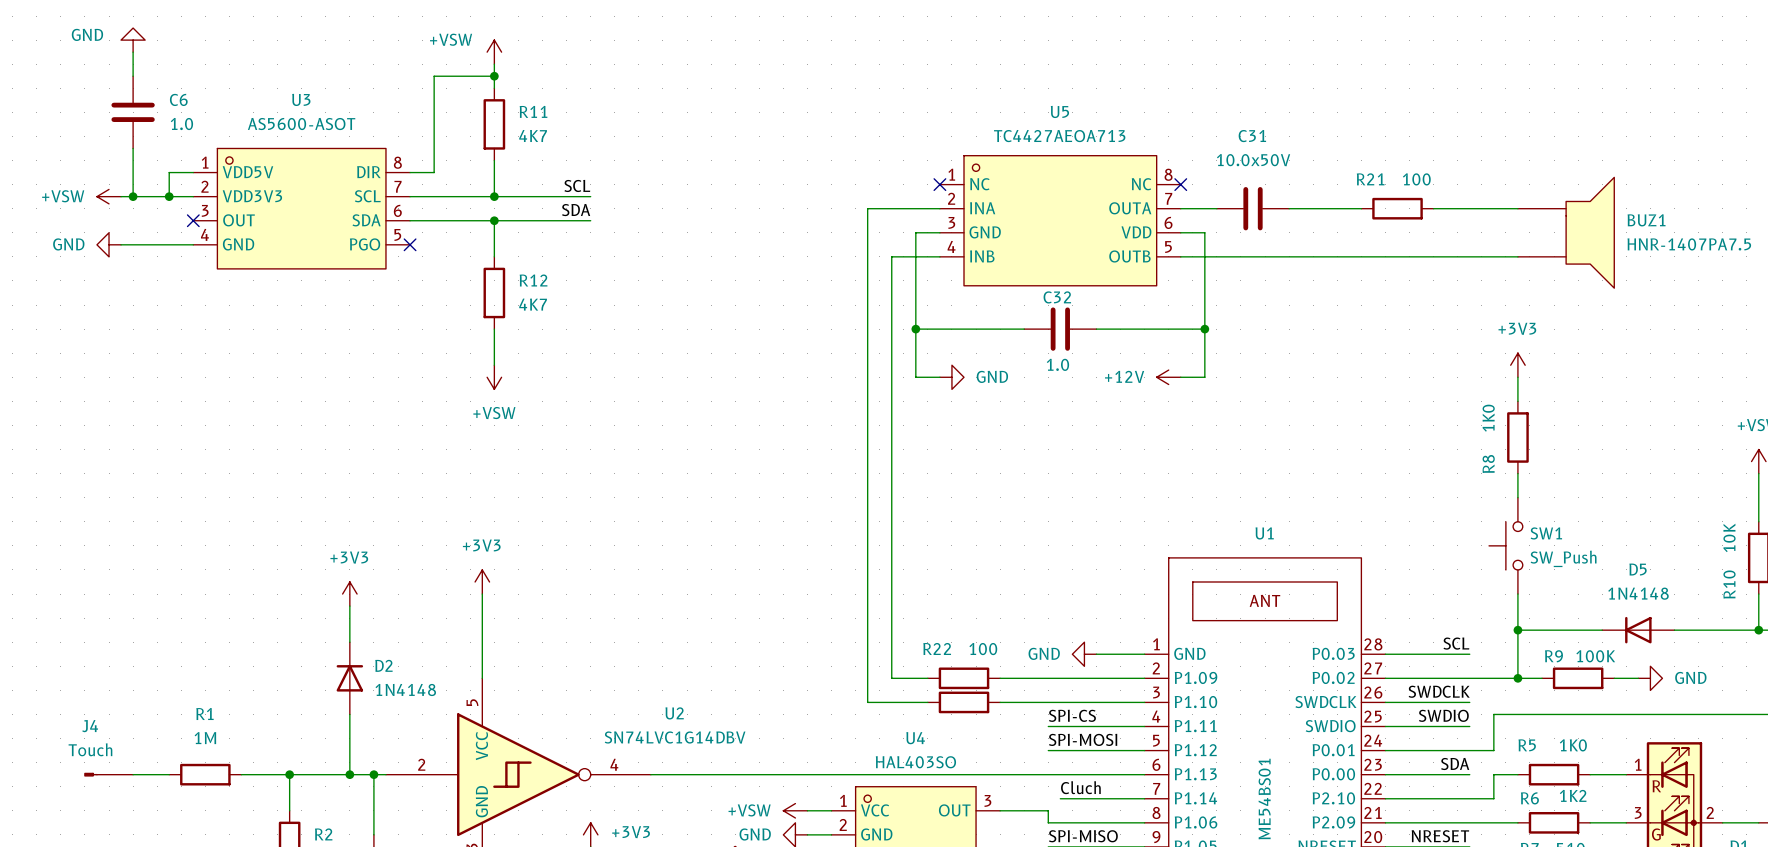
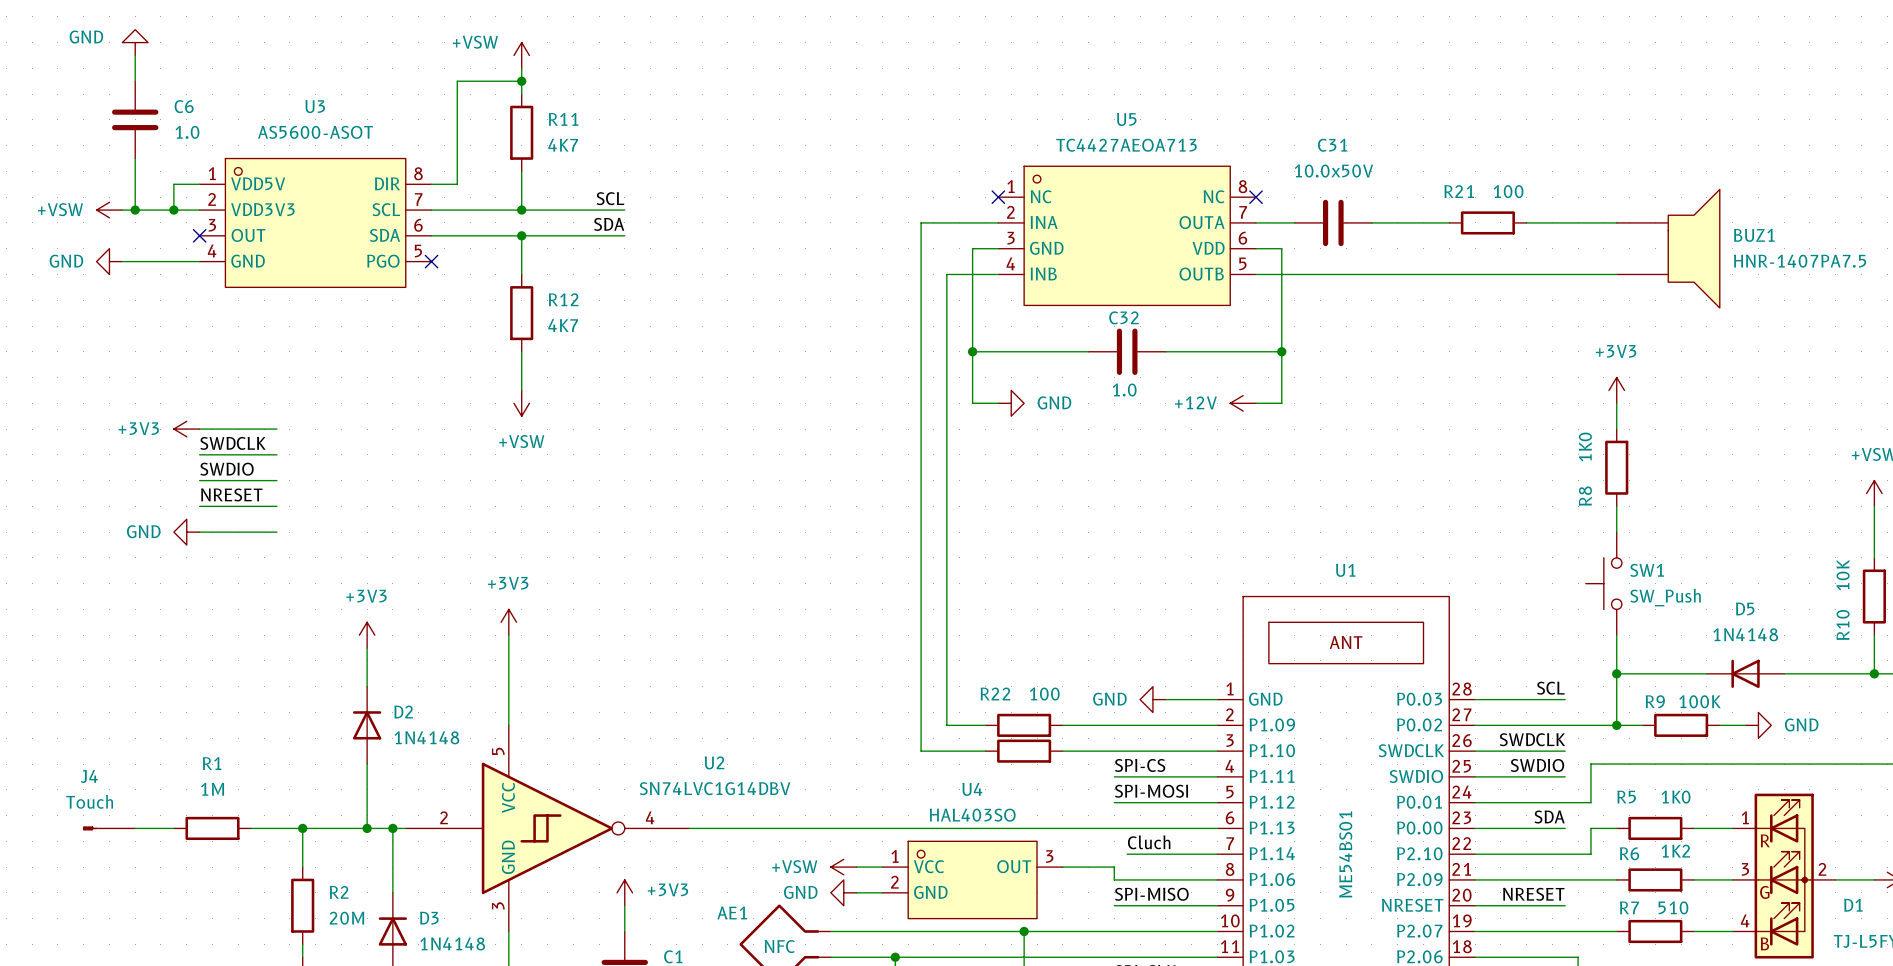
power symbol: none -> +3V3 (186, 429)
wire: none -> (199, 429) (276, 429)
label: none -> SWDCLK (233, 443)
wire: none -> (199, 454) (276, 454)
label: none -> SWDIO (227, 469)
wire: none -> (199, 480) (276, 480)
label: none -> NRESET (231, 494)
wire: none -> (199, 506) (276, 506)
power symbol: none -> GND (186, 532)
wire: none -> (199, 532) (276, 532)

